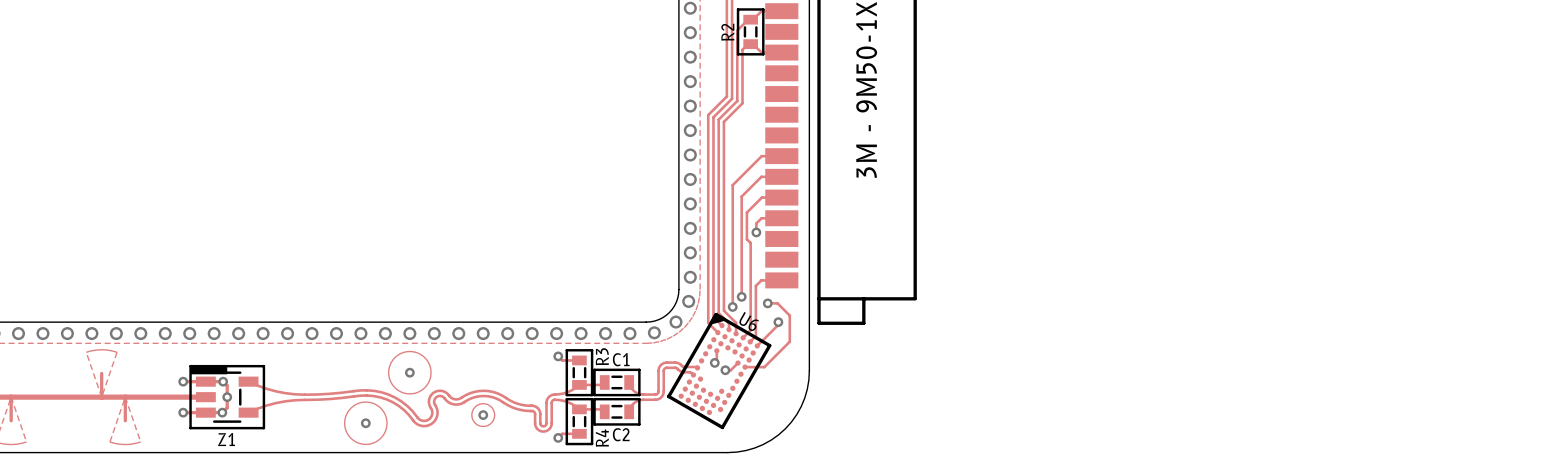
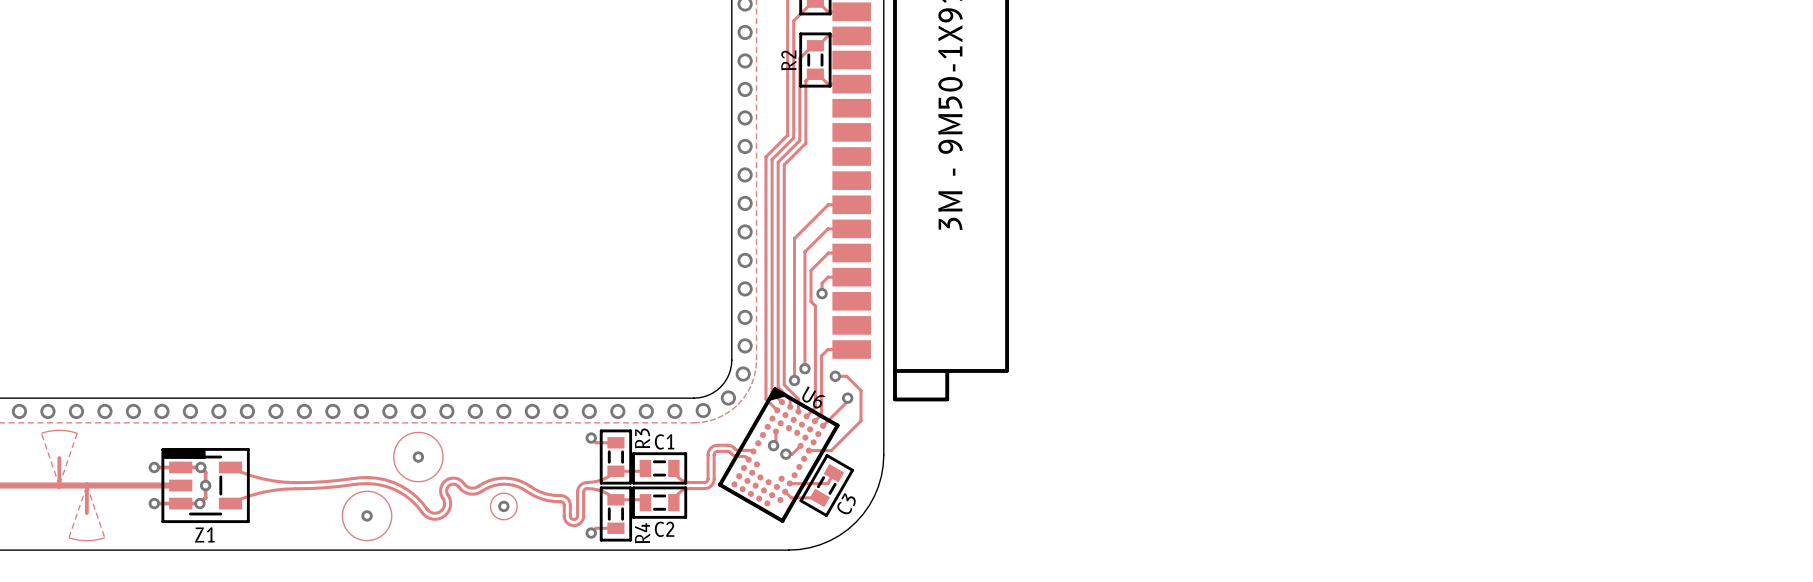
track: none -> (833, 473) (827, 483) (790, 483)
C3: none -> (826, 485)
track: none -> (785, 491) (791, 497) (819, 497)

